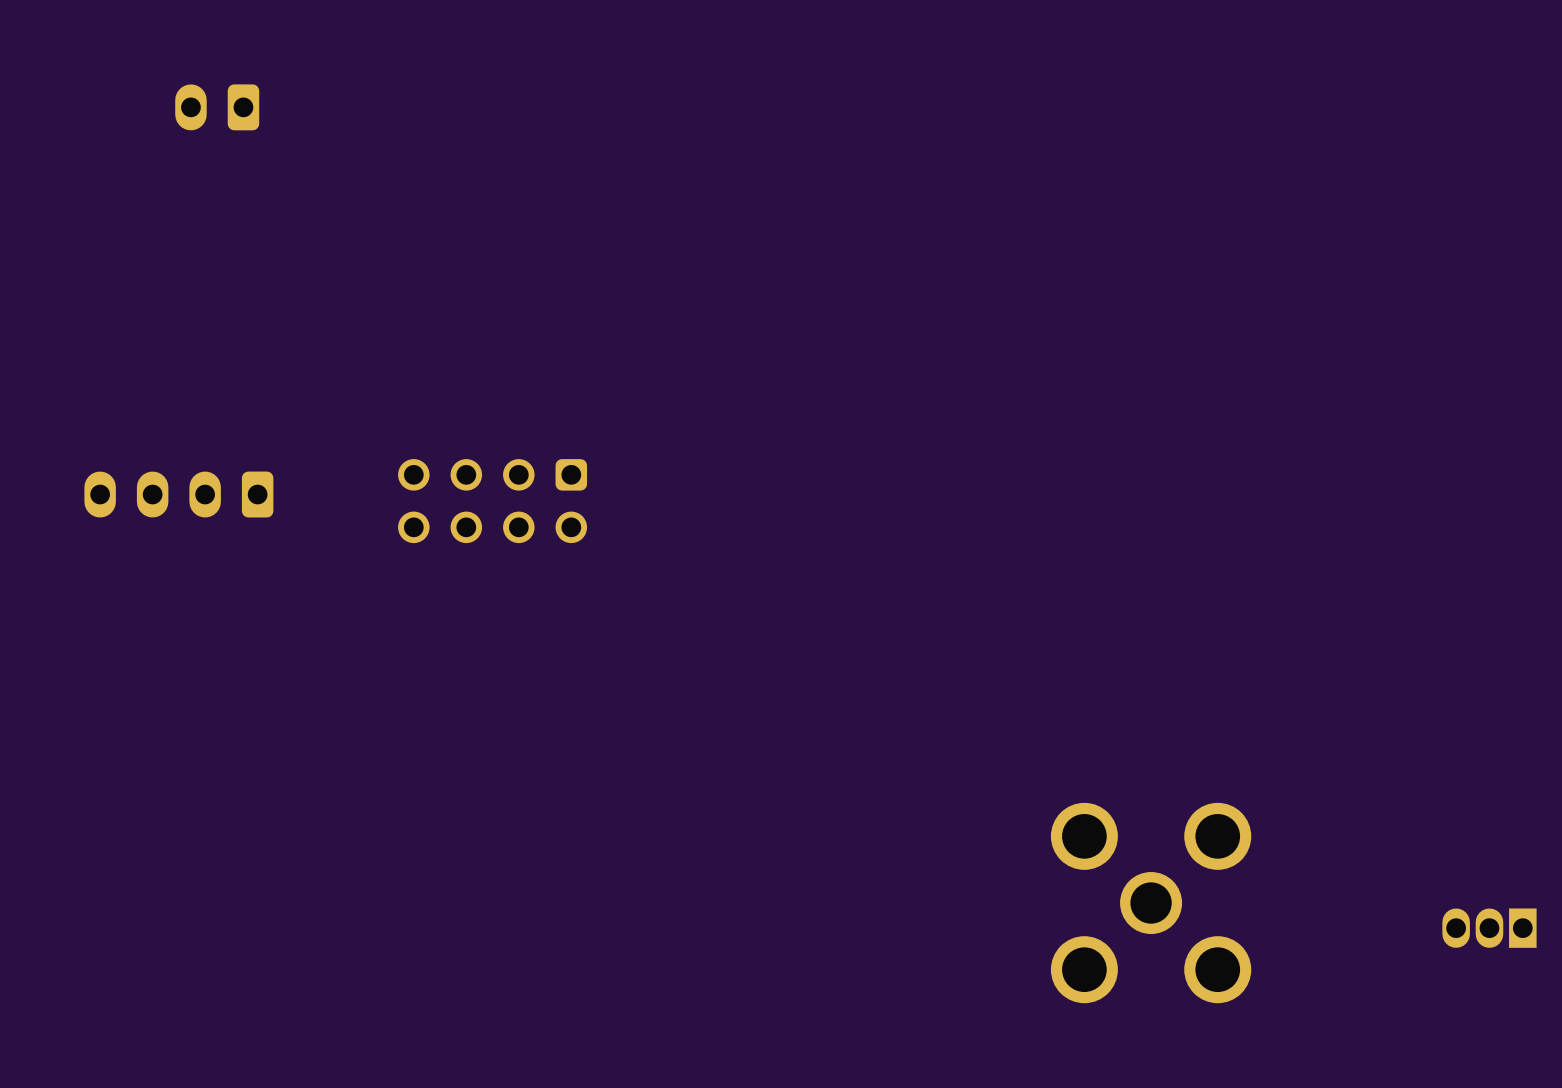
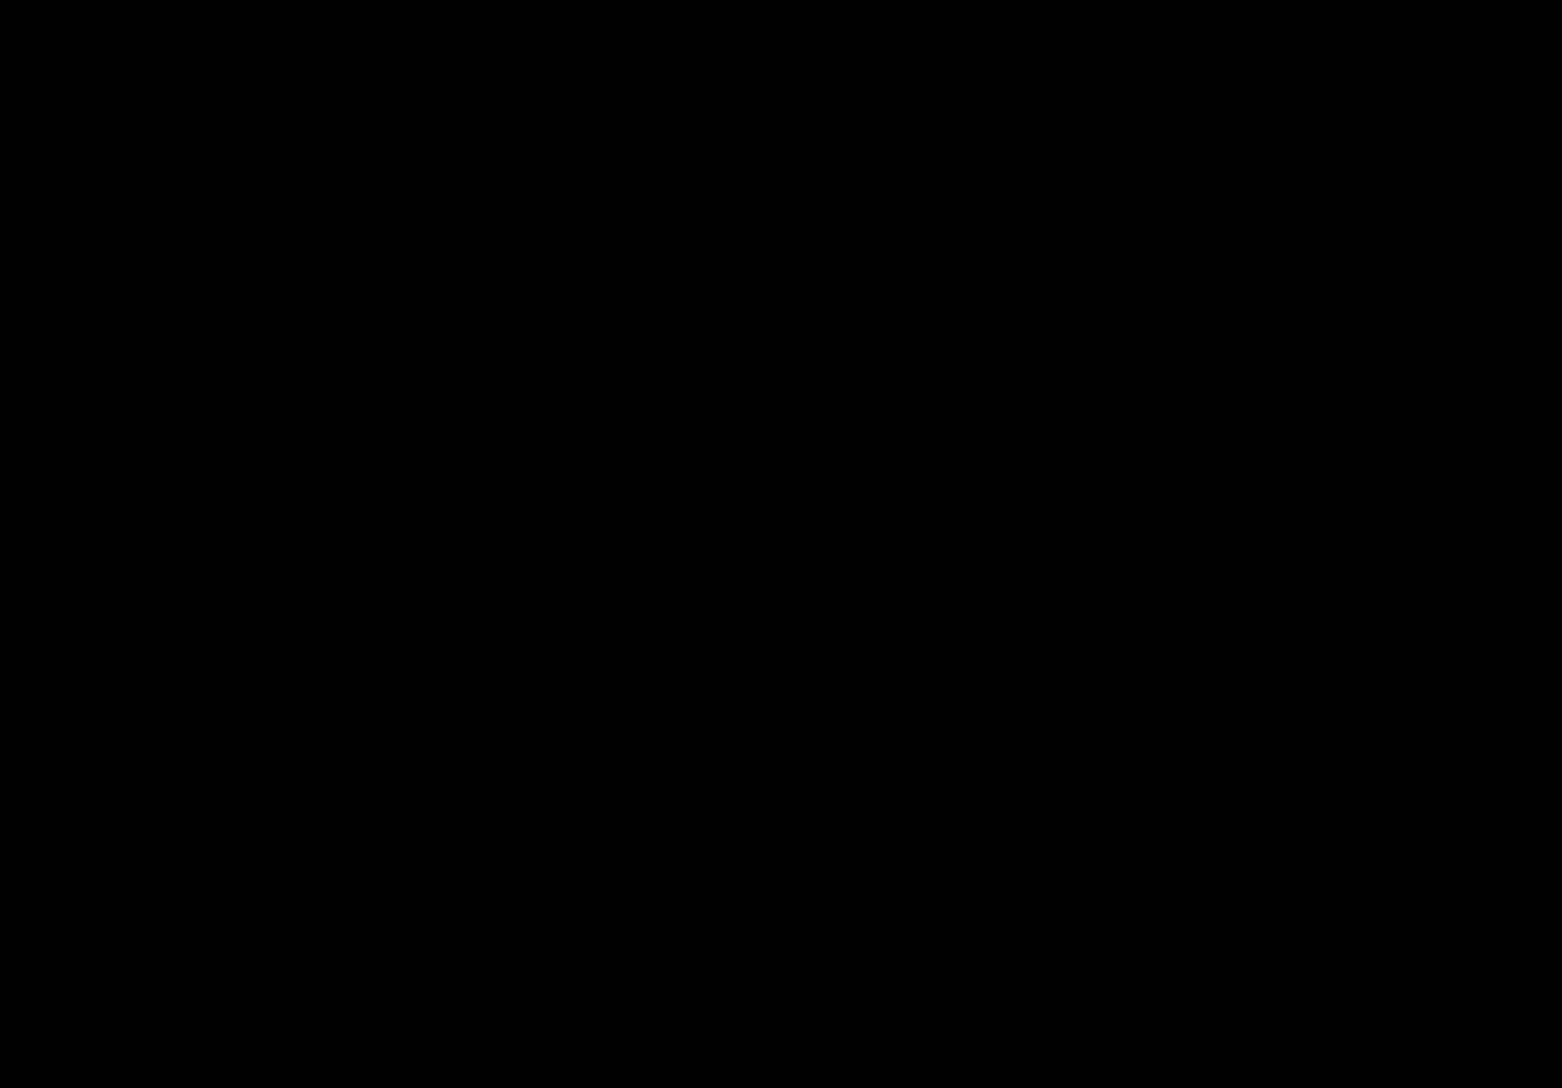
part: (217, 107) -> none
part: (178, 494) -> none
part: (492, 501) -> none
part: (1151, 903) -> none
part: (1489, 928) -> none

